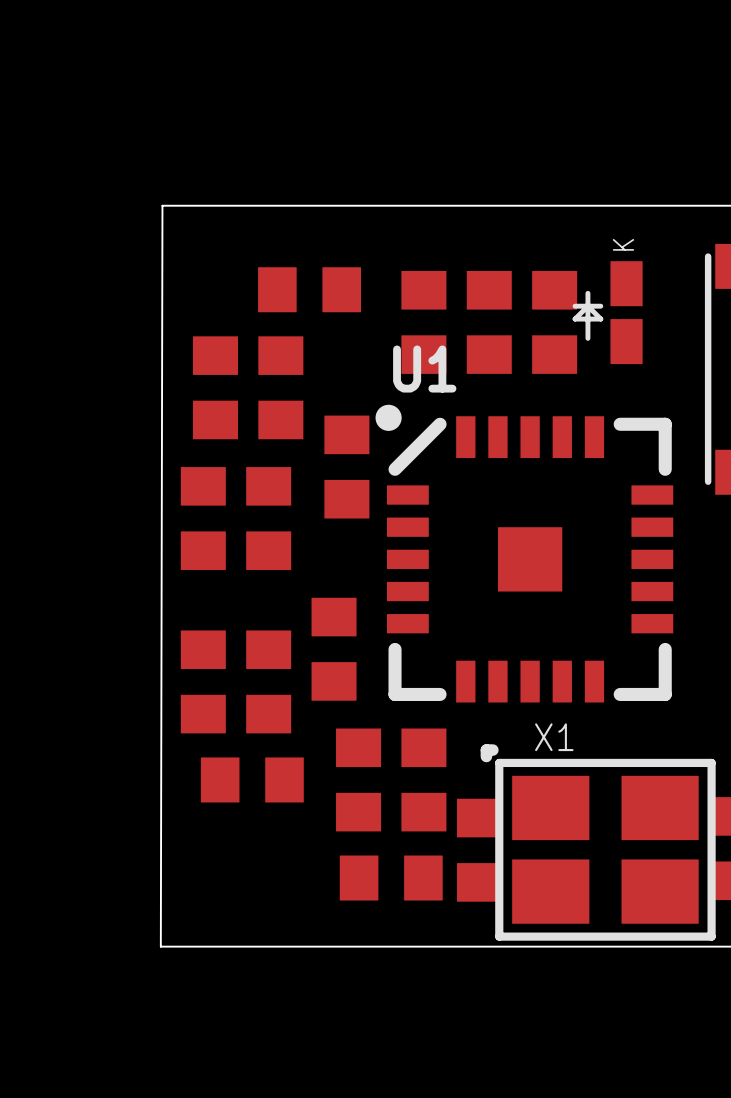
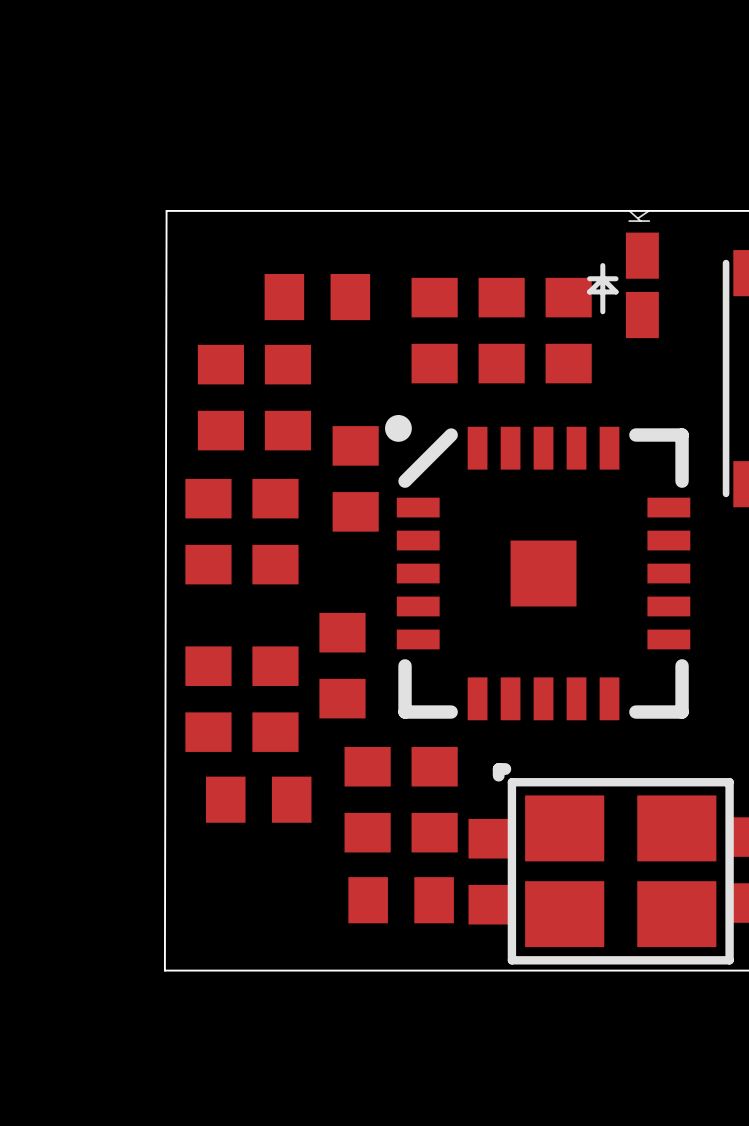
part position: (607, 312) -> (622, 285)
U1 name: U1 (424, 369) -> none
X1 name: X1 (554, 737) -> none

